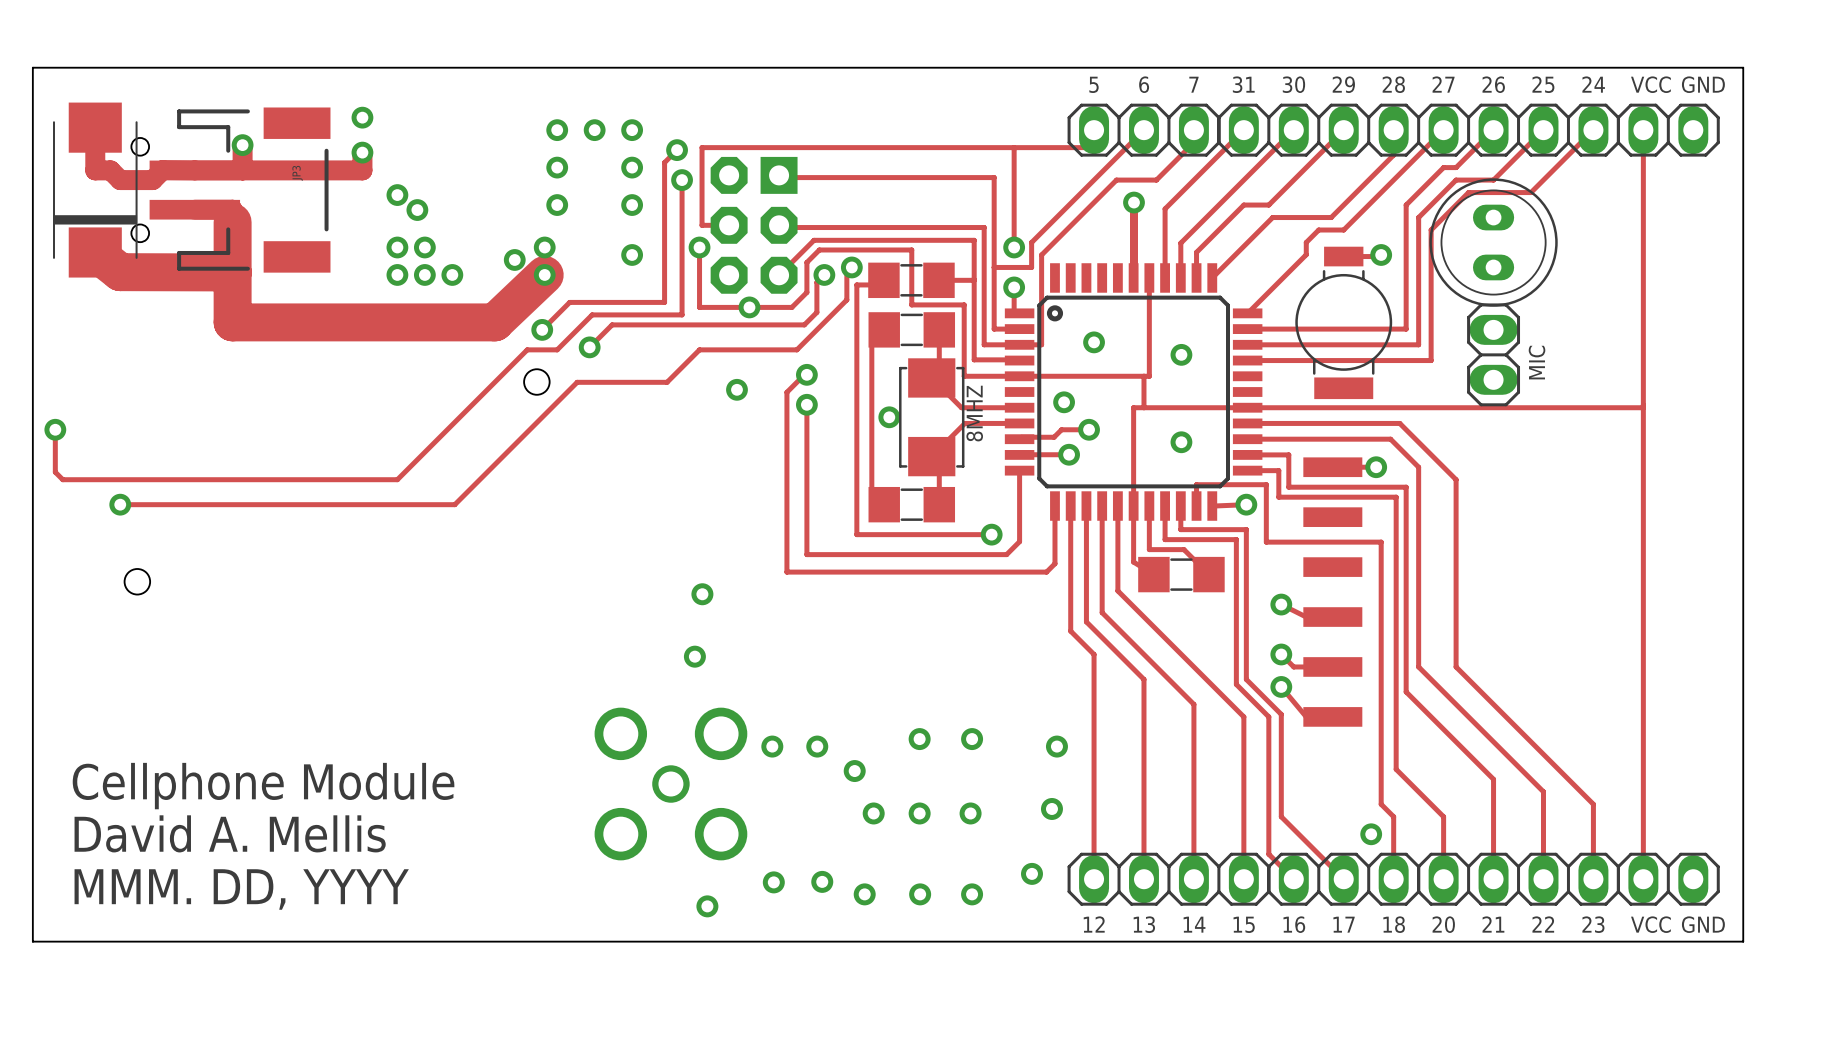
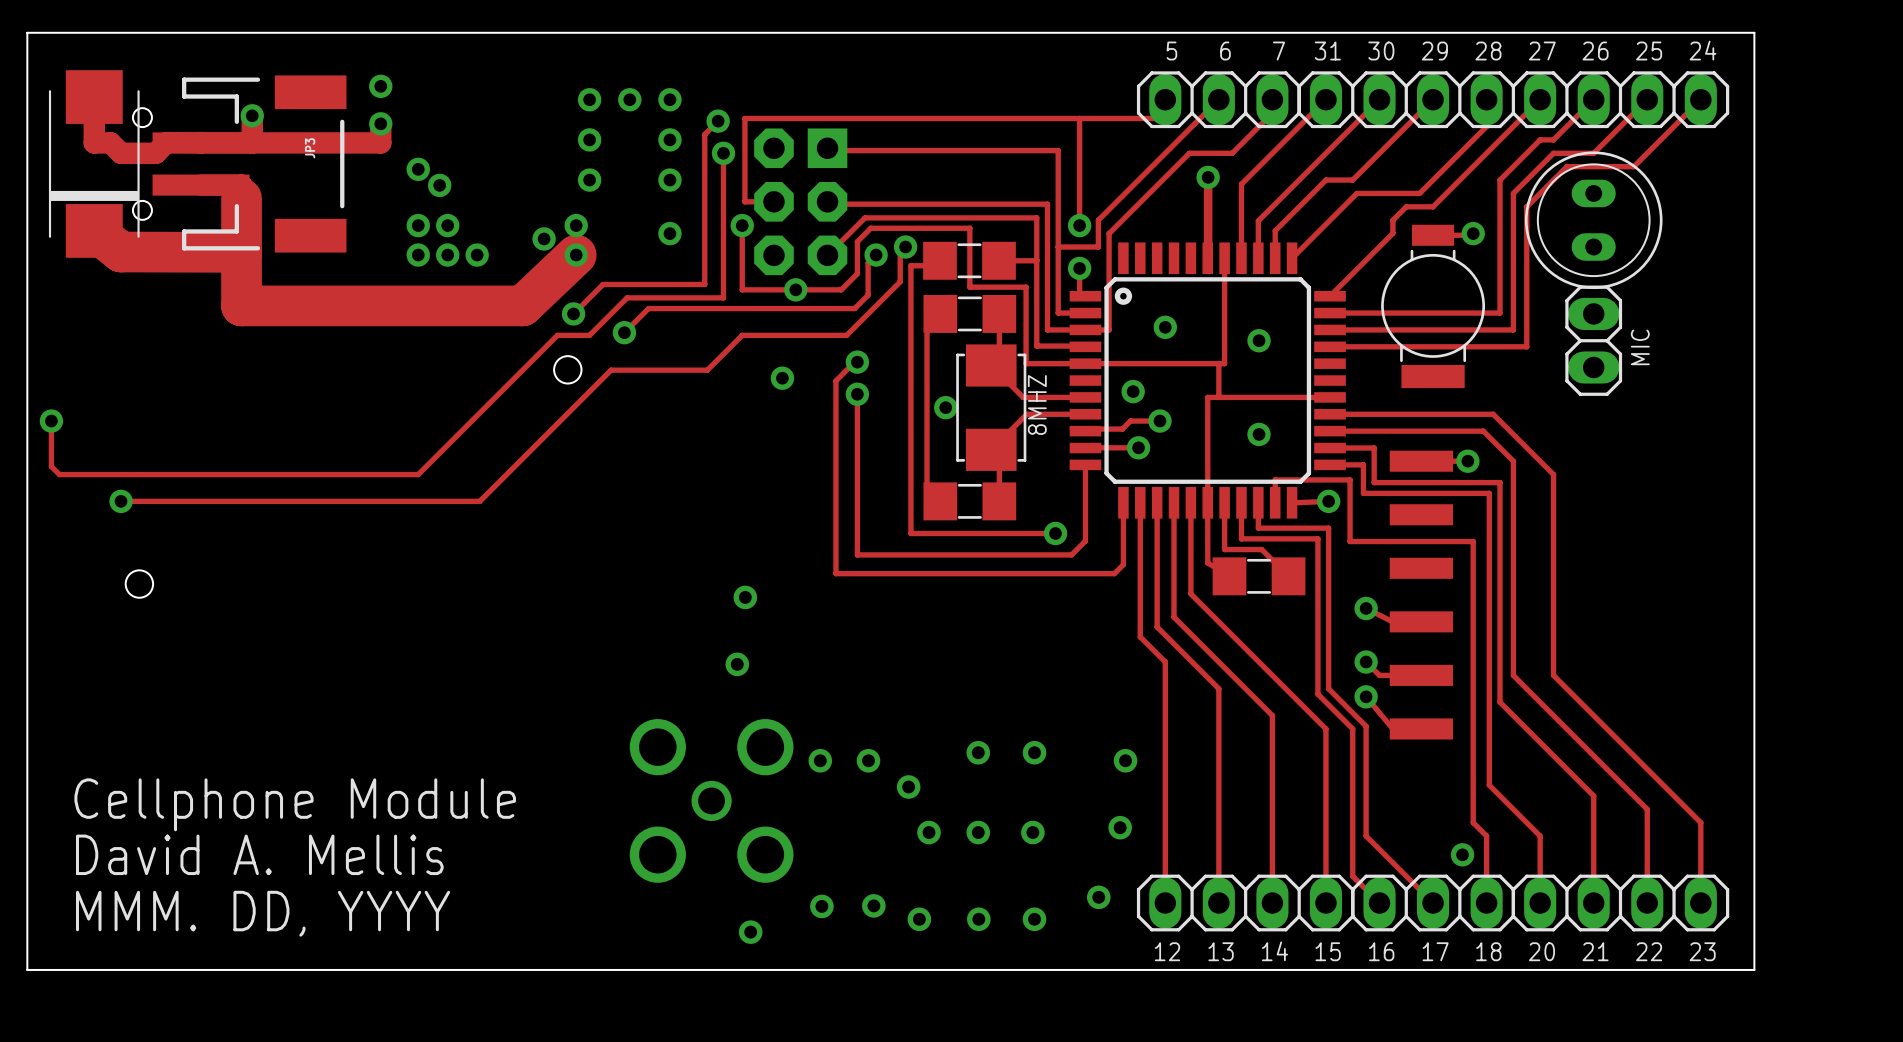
board edge: (1643, 67) (1743, 67) (1743, 941) (1643, 941) -> (1754, 32) (1754, 969)
text: VCC (1650, 84) -> none
text: GND (1703, 84) -> none
track: (1643, 130) (1643, 879) -> none
part: (1668, 130) -> none
track: (1247, 407) (1643, 407) -> none
part: (1668, 879) -> none
text: VCC (1650, 924) -> none
text: GND (1703, 924) -> none

